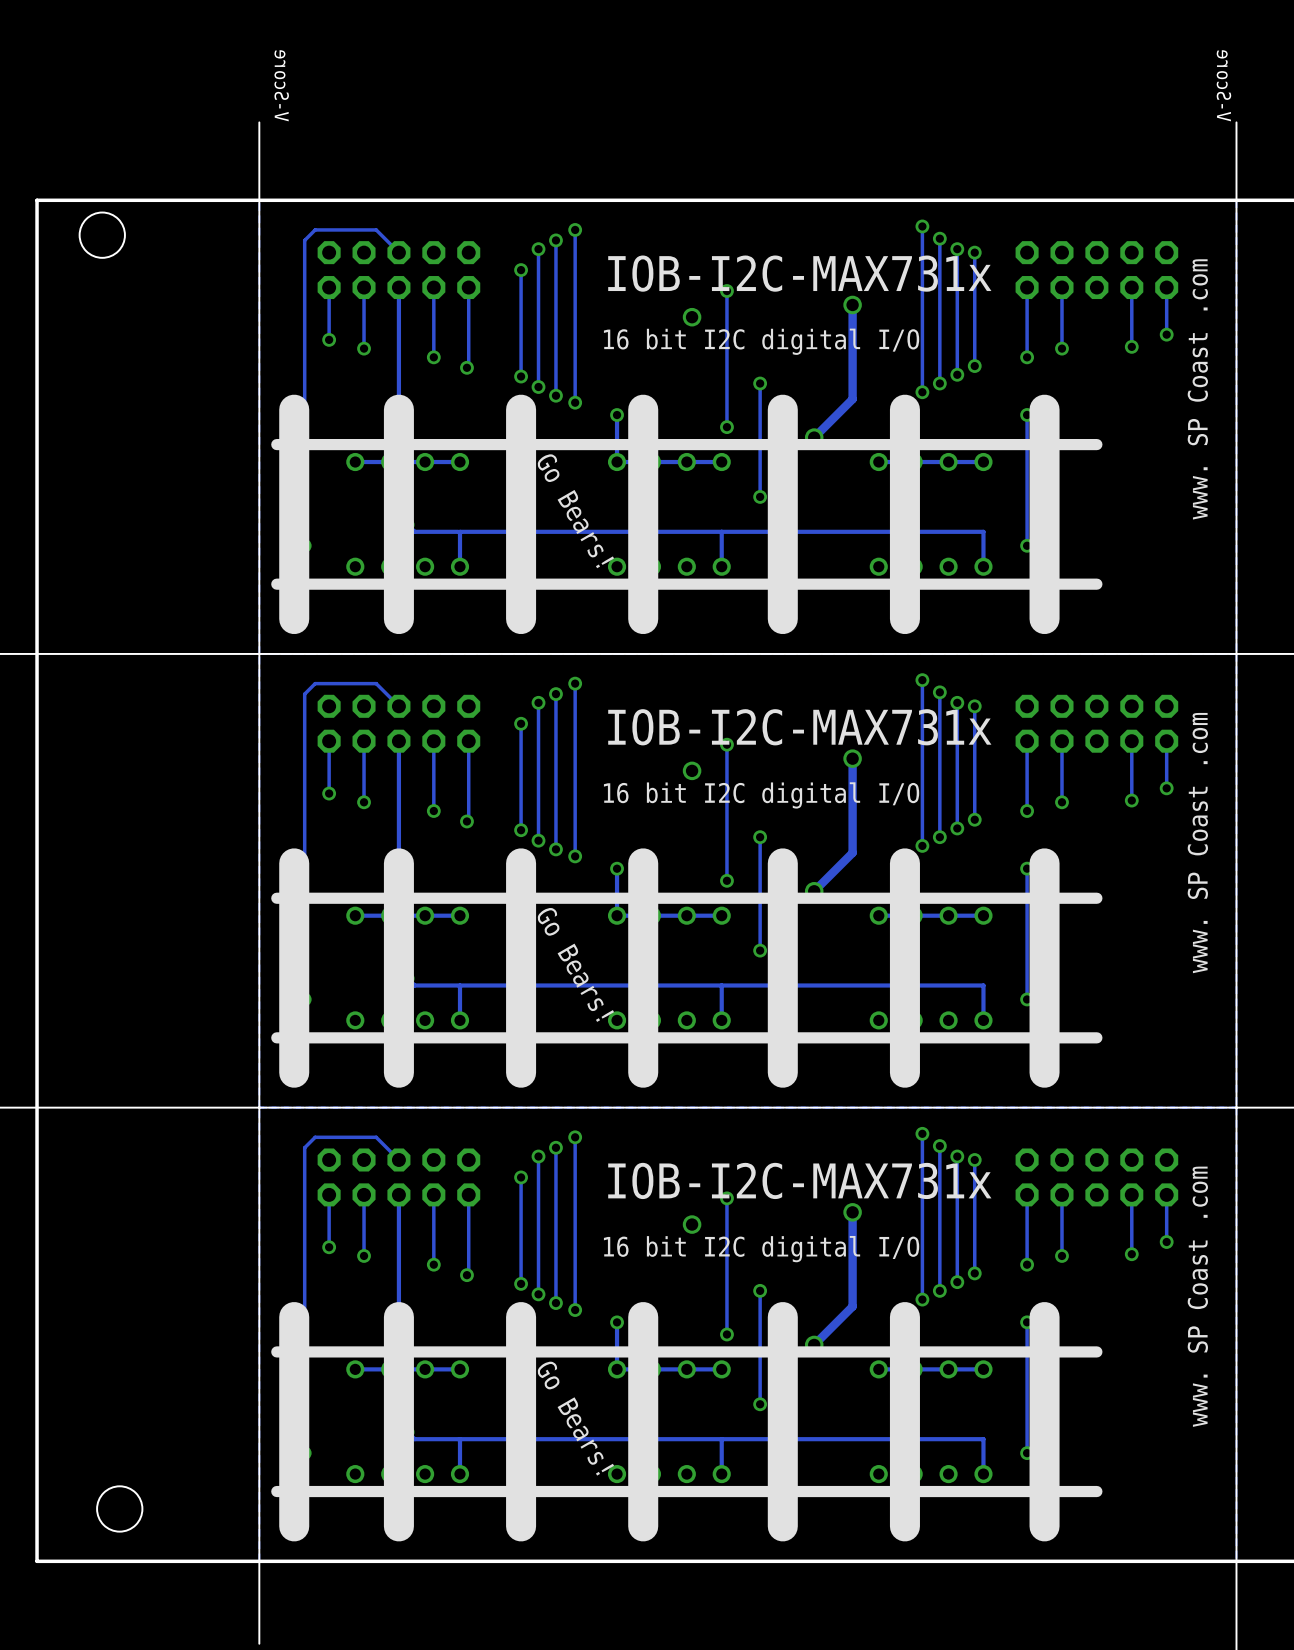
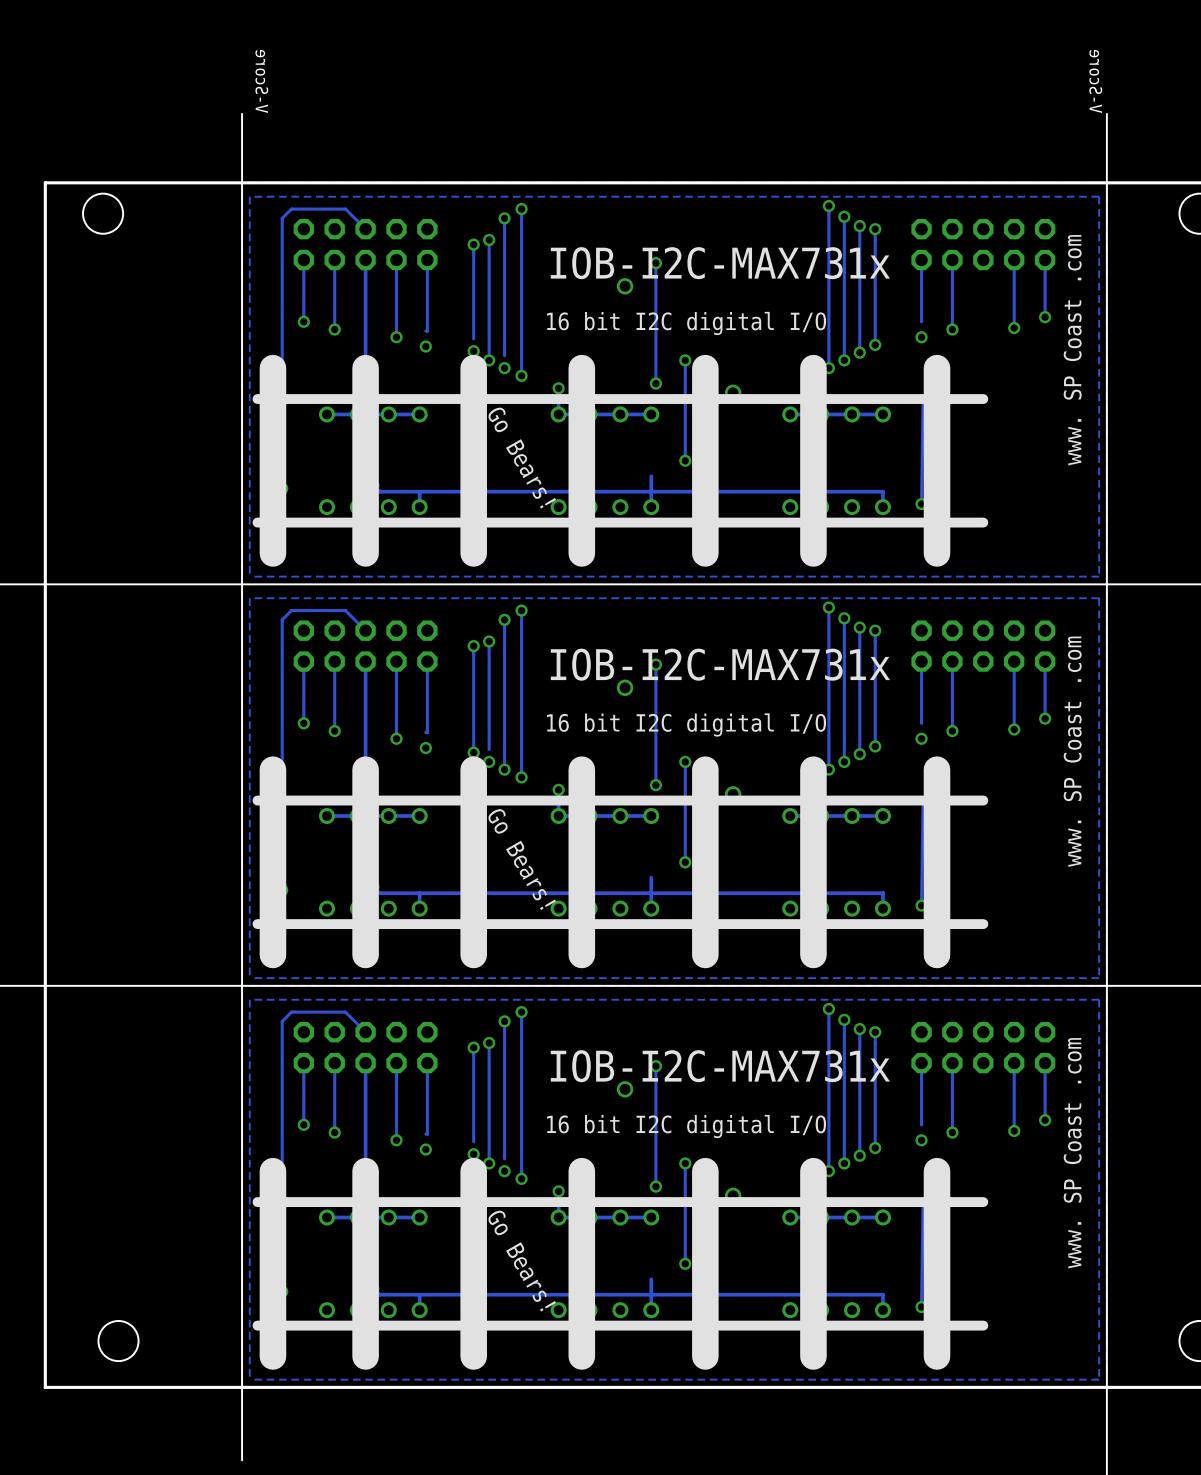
zone outline: none -> (1099, 196) (1099, 576) (249, 576) (249, 196) (1099, 196)
track: (538, 249) (538, 264) -> (521, 361) (521, 375)
via position: (538, 249) -> (489, 239)
text position: IOB-I2C-MAX731x (799, 273) -> IOB-I2C-MAX731x (720, 263)
track: (852, 304) (852, 399) (814, 437) -> none
via: (852, 304) -> none
track: none -> (1045, 301) (1045, 317)
via position: (1166, 334) -> (1045, 317)
track: none -> (303, 306) (303, 321)
via position: (329, 339) -> (303, 321)
text position: 16 bit I2C digital I/O (761, 341) -> 16 bit I2C digital I/O (686, 323)
track: none -> (1014, 312) (1014, 327)
via position: (1131, 346) -> (1014, 327)
track: none -> (334, 314) (334, 329)
via position: (364, 348) -> (334, 329)
track: none -> (952, 314) (952, 329)
via position: (1061, 348) -> (952, 329)
via: (433, 357) -> none
via position: (1027, 357) -> (921, 337)
track: none -> (875, 329) (875, 344)
via: (974, 366) -> none
via: (466, 367) -> none
via: none -> (396, 337)
track: none -> (859, 337) (859, 352)
via: (957, 374) -> none
via: (521, 376) -> none
track: (760, 383) (760, 400) -> (685, 445) (685, 460)
via position: (760, 383) -> (685, 360)
track: none -> (844, 344) (844, 360)
via: (939, 383) -> none
via: none -> (875, 344)
via: none -> (425, 346)
track: none -> (489, 348) (489, 360)
via: (538, 386) -> none
via: none -> (473, 351)
track: none -> (828, 352) (828, 368)
via: (922, 392) -> none
via: none -> (859, 352)
via: (555, 395) -> none
via: none -> (489, 360)
via: none -> (844, 360)
via: (575, 402) -> none
via: none -> (504, 368)
via: none -> (828, 368)
track: (1027, 414) (1027, 545) -> none
via: (1027, 414) -> none
track: (617, 415) (617, 432) -> (396, 321) (396, 337)
via position: (617, 415) -> (558, 388)
via: none -> (521, 375)
track: none -> (923, 402) (921, 504)
via position: (760, 496) -> (685, 460)
track: (407, 524) (414, 531) (458, 531) (460, 533) -> (373, 485) (379, 491) (419, 493)
via: (1027, 545) -> none
track: (983, 549) (983, 531) (460, 531) (460, 549) -> (882, 491) (419, 491)
via: none -> (921, 504)
zone outline: none -> (1099, 598) (1099, 978) (249, 978) (249, 598) (1099, 598)
track: (538, 702) (538, 718) -> (521, 763) (521, 777)
via position: (538, 702) -> (489, 641)
text position: IOB-I2C-MAX731x (799, 727) -> IOB-I2C-MAX731x (720, 664)
track: (852, 758) (852, 852) (814, 891) -> none
via: (852, 758) -> none
track: none -> (1045, 703) (1045, 718)
via position: (1166, 788) -> (1045, 718)
track: none -> (303, 707) (303, 723)
via position: (329, 793) -> (303, 723)
text position: 16 bit I2C digital I/O (761, 795) -> 16 bit I2C digital I/O (686, 724)
track: none -> (1014, 714) (1014, 729)
via position: (1131, 800) -> (1014, 729)
track: none -> (334, 715) (334, 731)
via position: (364, 802) -> (334, 731)
track: none -> (952, 715) (952, 731)
via position: (1061, 802) -> (952, 731)
via: (433, 811) -> none
via position: (1027, 811) -> (921, 738)
track: none -> (875, 731) (875, 746)
via: (974, 819) -> none
via: (466, 821) -> none
via: none -> (396, 738)
track: none -> (859, 738) (859, 754)
via: (957, 828) -> none
track: none -> (473, 740) (473, 752)
via: (521, 830) -> none
track: (760, 837) (760, 854) -> (685, 846) (685, 862)
via position: (760, 837) -> (685, 761)
track: none -> (844, 746) (844, 761)
via: (939, 837) -> none
via: none -> (875, 746)
via: none -> (425, 748)
via: (538, 840) -> none
via: none -> (473, 752)
track: none -> (828, 754) (828, 769)
via: (922, 845) -> none
via: none -> (859, 754)
track: none -> (504, 757) (504, 769)
via: (555, 849) -> none
via: none -> (489, 761)
via: none -> (844, 761)
via: (575, 856) -> none
via: none -> (504, 769)
via: none -> (828, 769)
track: (617, 868) (617, 886) -> (396, 723) (396, 738)
via position: (617, 868) -> (558, 789)
track: (1027, 868) (1027, 999) -> none
via: (1027, 868) -> none
via: none -> (521, 777)
track: none -> (923, 803) (921, 905)
via position: (760, 950) -> (685, 862)
track: (407, 978) (414, 985) (458, 985) (460, 987) -> (373, 887) (379, 893) (419, 894)
via: (1027, 999) -> none
track: (983, 1002) (983, 985) (460, 985) (460, 1002) -> (882, 893) (419, 893)
via: none -> (921, 905)
zone outline: none -> (1099, 999) (249, 999) (249, 1379) (1099, 1379) (1099, 999)
track: (538, 1156) (538, 1172) -> (521, 1165) (521, 1178)
via position: (538, 1156) -> (489, 1043)
text position: IOB-I2C-MAX731x (799, 1180) -> IOB-I2C-MAX731x (720, 1066)
track: (852, 1212) (852, 1306) (814, 1344) -> none
via: (852, 1212) -> none
track: none -> (1045, 1104) (1045, 1120)
via position: (1166, 1242) -> (1045, 1120)
track: none -> (303, 1109) (303, 1124)
via position: (329, 1247) -> (303, 1124)
text position: 16 bit I2C digital I/O (761, 1249) -> 16 bit I2C digital I/O (686, 1126)
track: none -> (1014, 1115) (1014, 1131)
via position: (1131, 1254) -> (1014, 1131)
track: none -> (334, 1117) (334, 1132)
via position: (364, 1255) -> (334, 1132)
track: none -> (952, 1117) (952, 1132)
via position: (1061, 1255) -> (952, 1132)
via: (433, 1264) -> none
via position: (1027, 1264) -> (921, 1140)
track: none -> (875, 1132) (875, 1148)
via: (974, 1273) -> none
via: (466, 1275) -> none
via: none -> (396, 1140)
track: none -> (859, 1140) (859, 1155)
via: (957, 1282) -> none
via: (521, 1283) -> none
track: (760, 1290) (760, 1308) -> (685, 1248) (685, 1263)
via position: (760, 1290) -> (685, 1163)
track: none -> (844, 1148) (844, 1163)
via: (939, 1290) -> none
via: none -> (875, 1148)
via: none -> (425, 1149)
track: none -> (489, 1151) (489, 1163)
via: (538, 1294) -> none
via: none -> (473, 1154)
track: none -> (828, 1155) (828, 1171)
via: (922, 1299) -> none
via: none -> (859, 1155)
via: (555, 1303) -> none
via: none -> (489, 1163)
via: none -> (844, 1163)
via: (575, 1310) -> none
via: none -> (504, 1171)
via: none -> (828, 1171)
track: (617, 1322) (617, 1339) -> (396, 1124) (396, 1140)
via position: (617, 1322) -> (558, 1191)
track: (1027, 1322) (1027, 1453) -> none
via: (1027, 1322) -> none
via: none -> (521, 1178)
track: none -> (923, 1205) (921, 1307)
via position: (760, 1404) -> (685, 1263)
track: (407, 1432) (414, 1439) (458, 1439) (460, 1440) -> (373, 1288) (379, 1294) (419, 1296)
via: (1027, 1453) -> none
track: (983, 1456) (983, 1439) (460, 1439) (460, 1456) -> (882, 1294) (419, 1294)
via: none -> (921, 1307)

